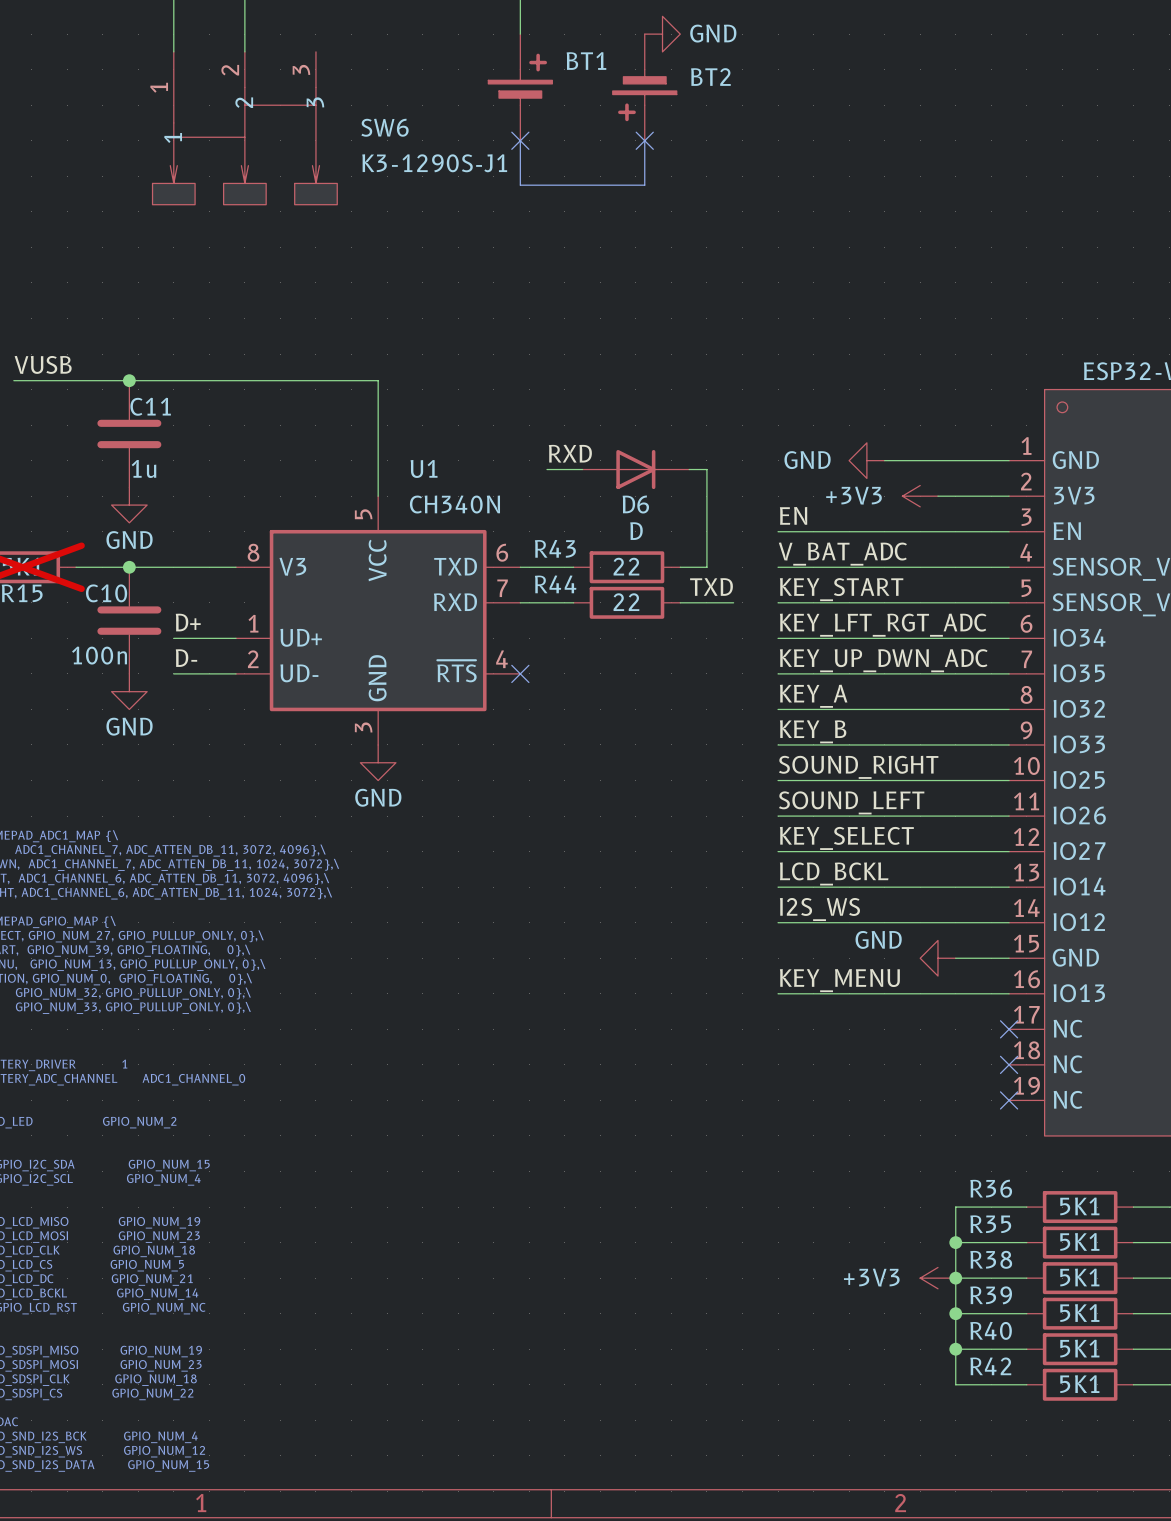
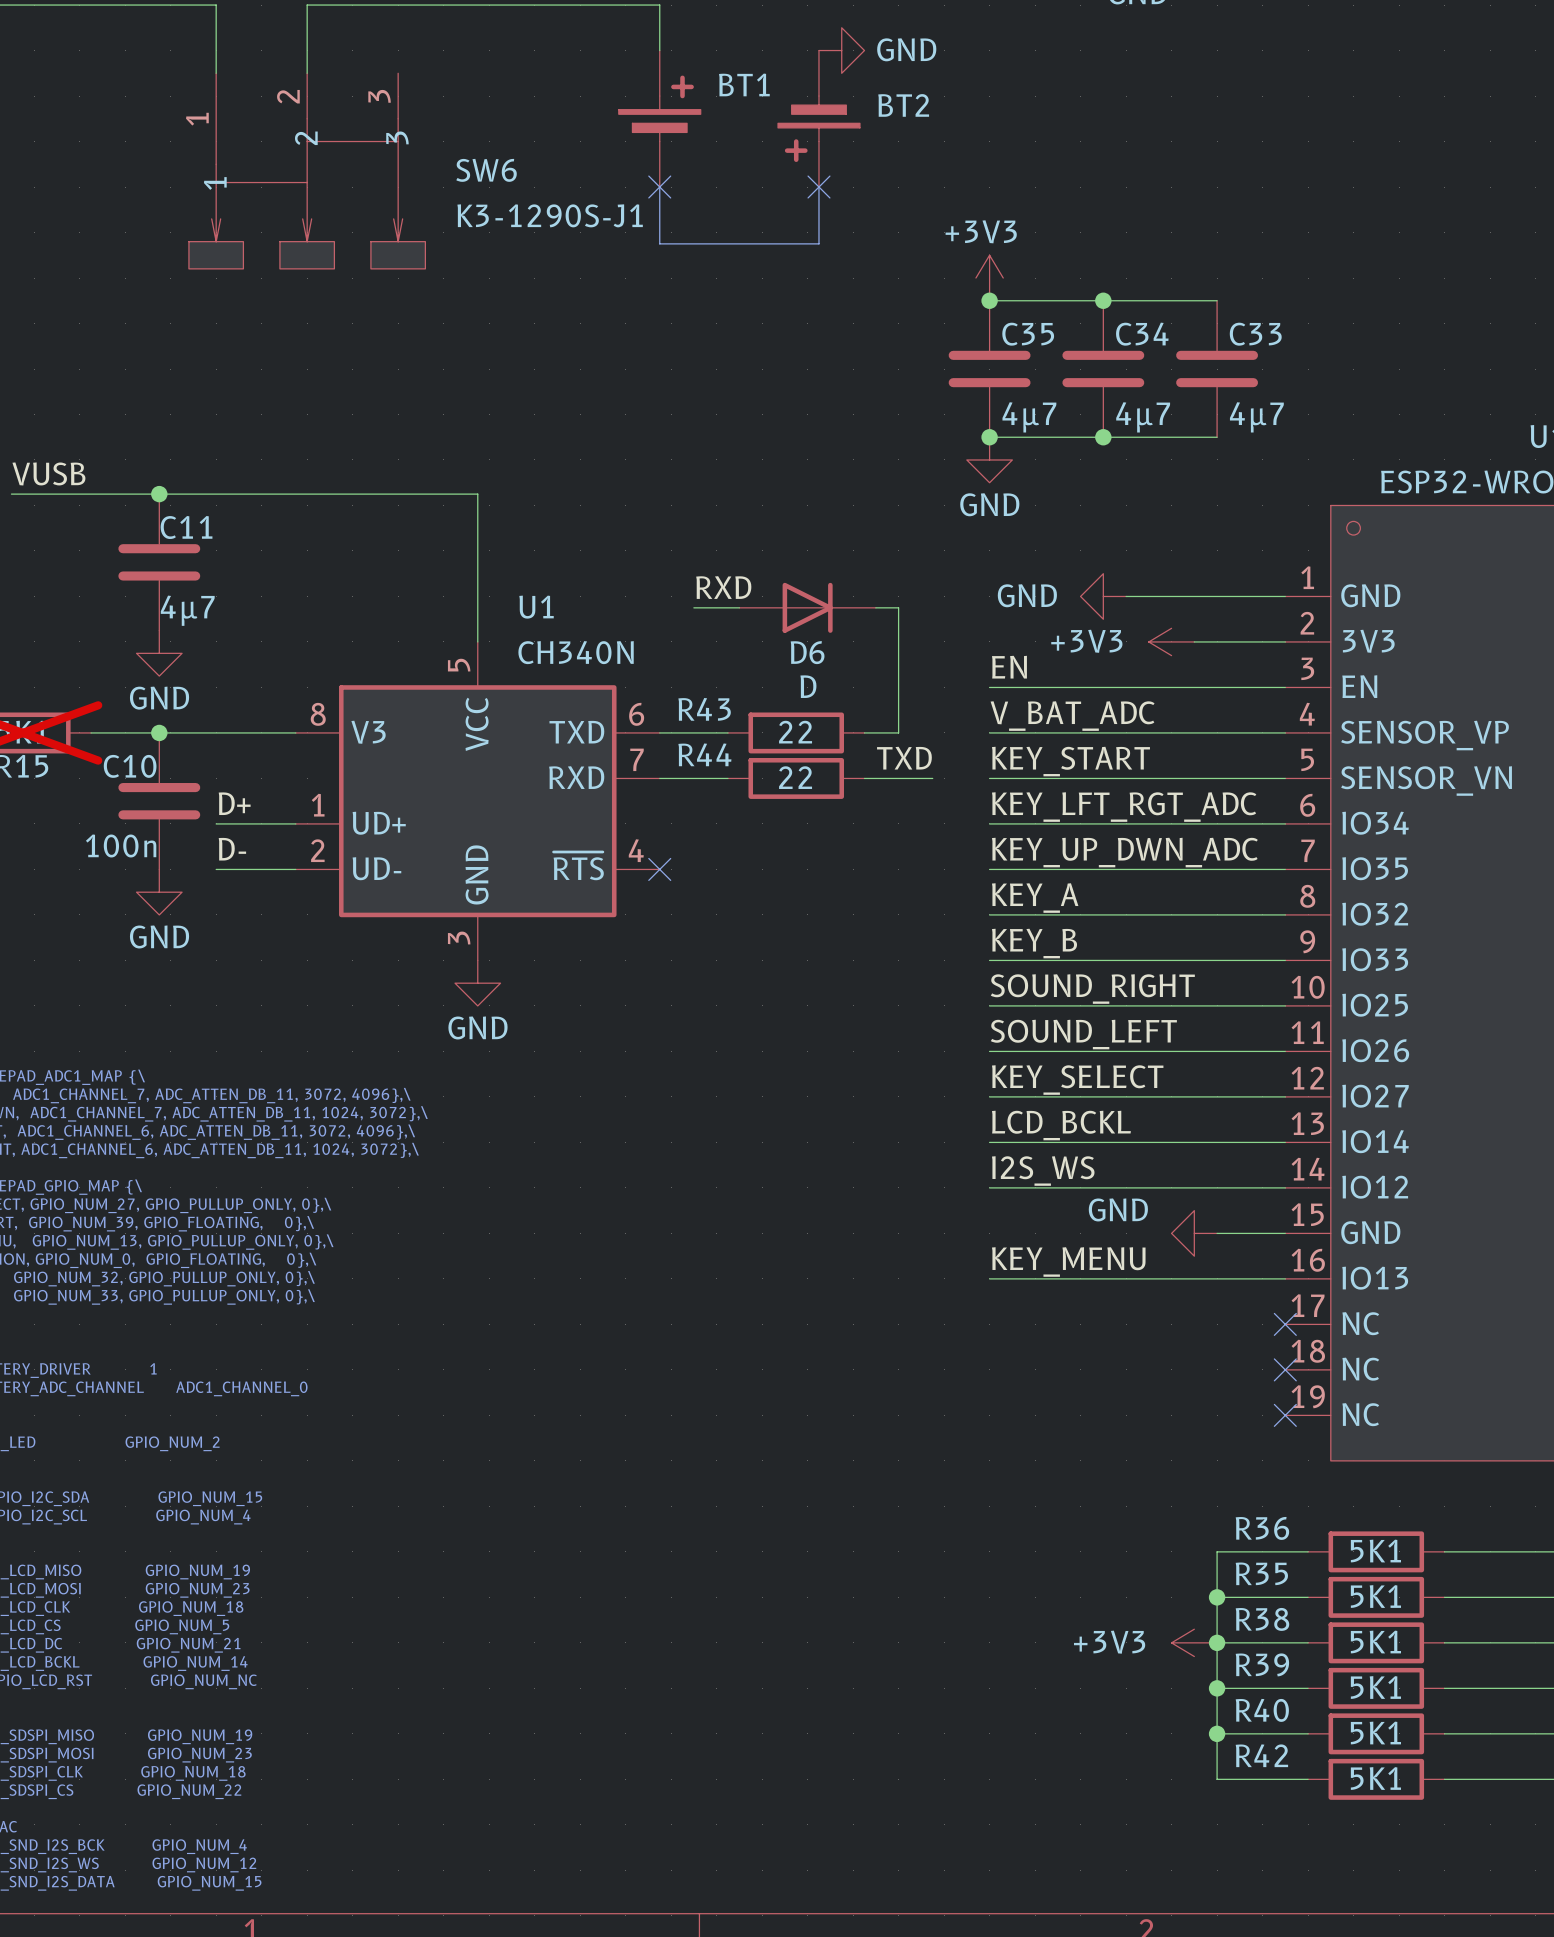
power symbol: none -> +3V3 (989, 278)
wire: none -> (989, 300) (1217, 300)
junction: none -> (989, 300)
junction: none -> (1103, 300)
C35: none -> 4µ7 (989, 369)
C34: none -> 4µ7 (1103, 369)
C33: none -> 4µ7 (1217, 369)
wire: none -> (989, 437) (1217, 437)
junction: none -> (989, 437)
junction: none -> (1103, 437)
power symbol: none -> GND (989, 459)
C11 value: 1u (143, 468) -> 4µ7 (187, 610)

